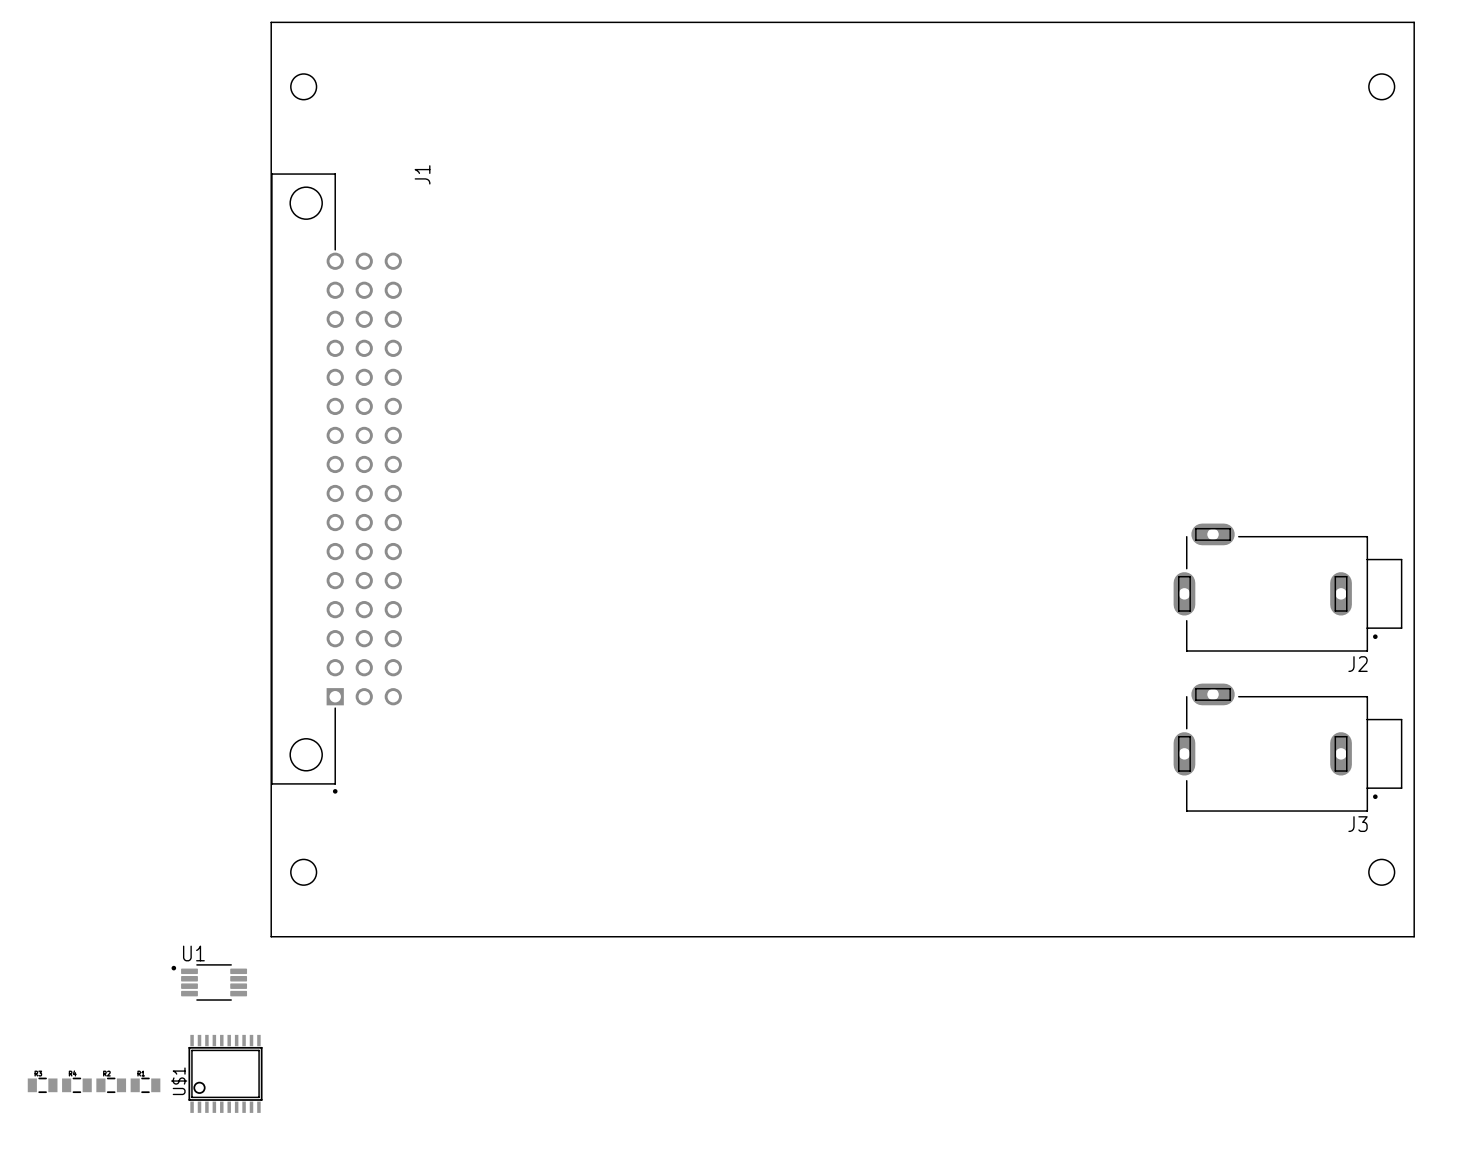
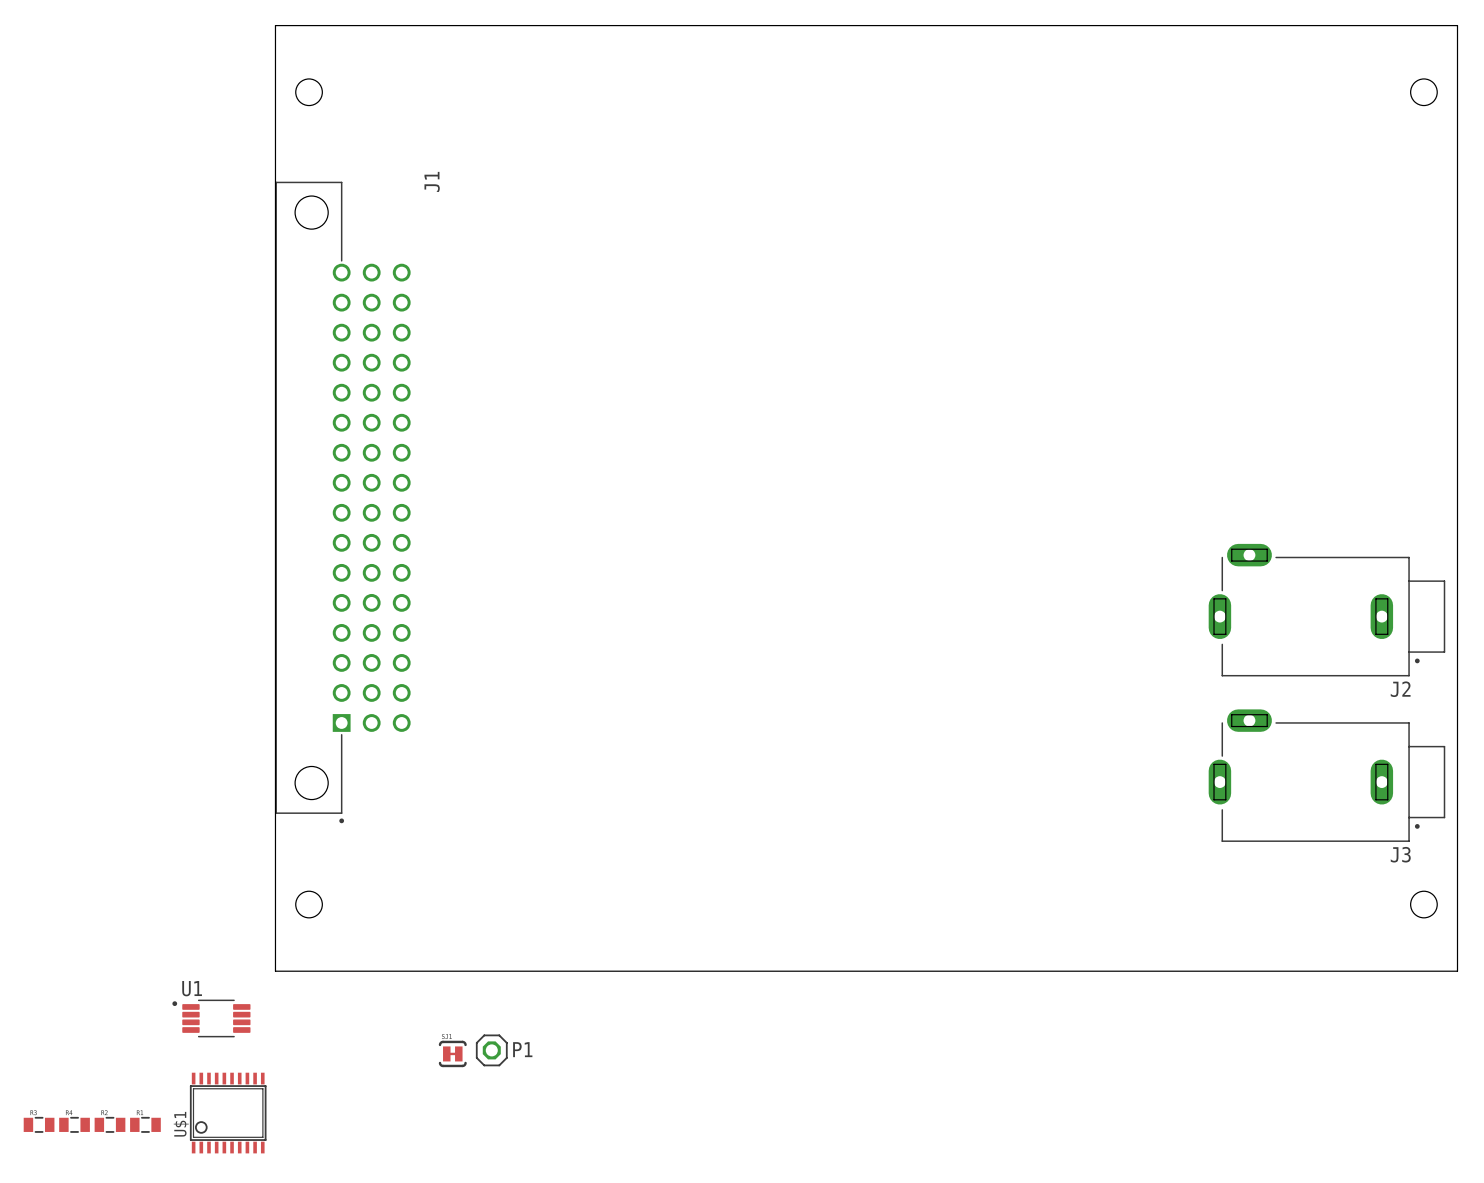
P1: none -> (491, 1050)
part: none -> (452, 1053)

